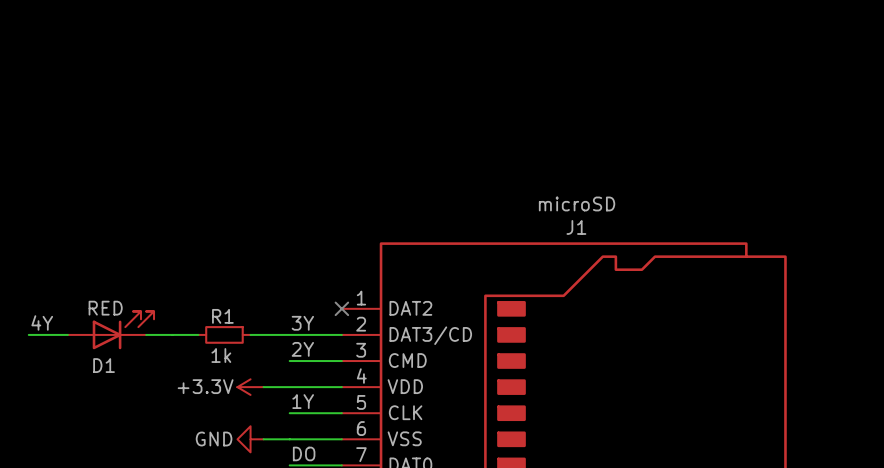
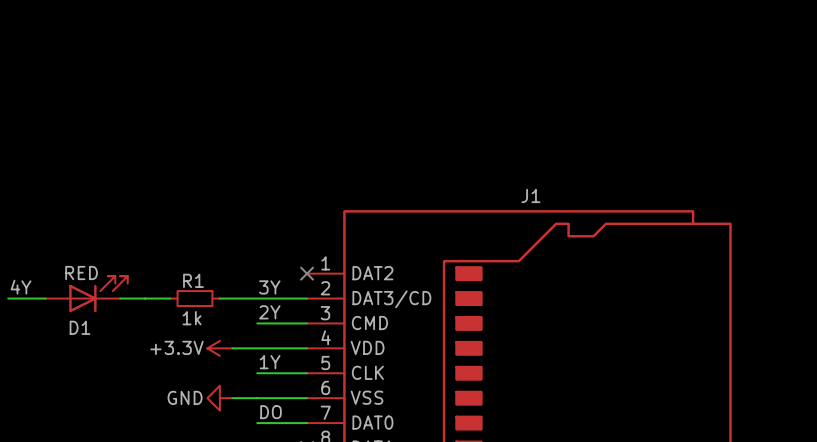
J1 value: microSD (577, 203) -> none

